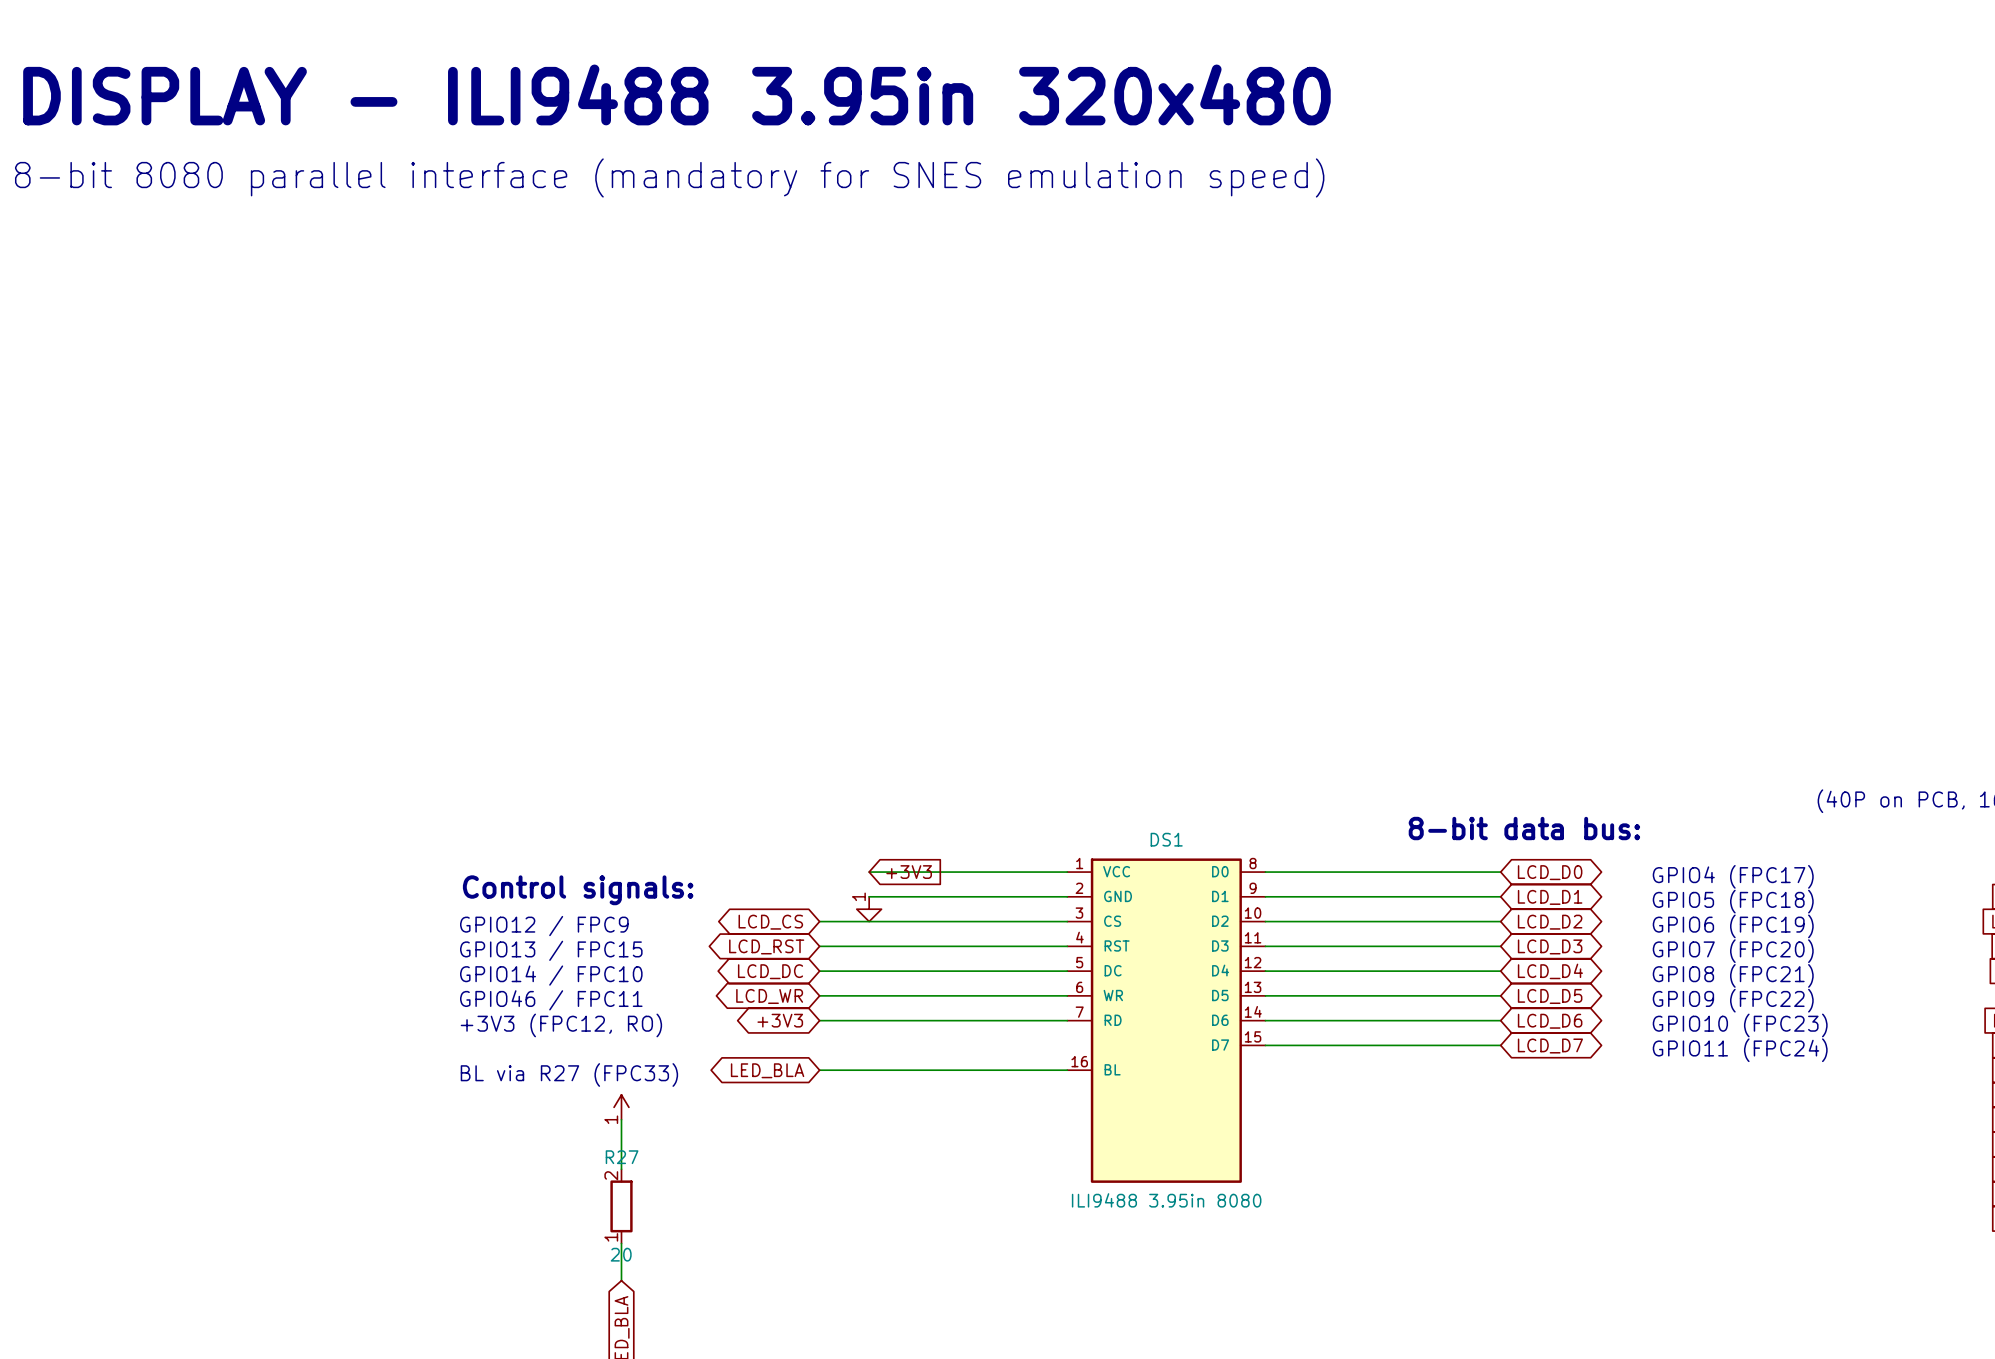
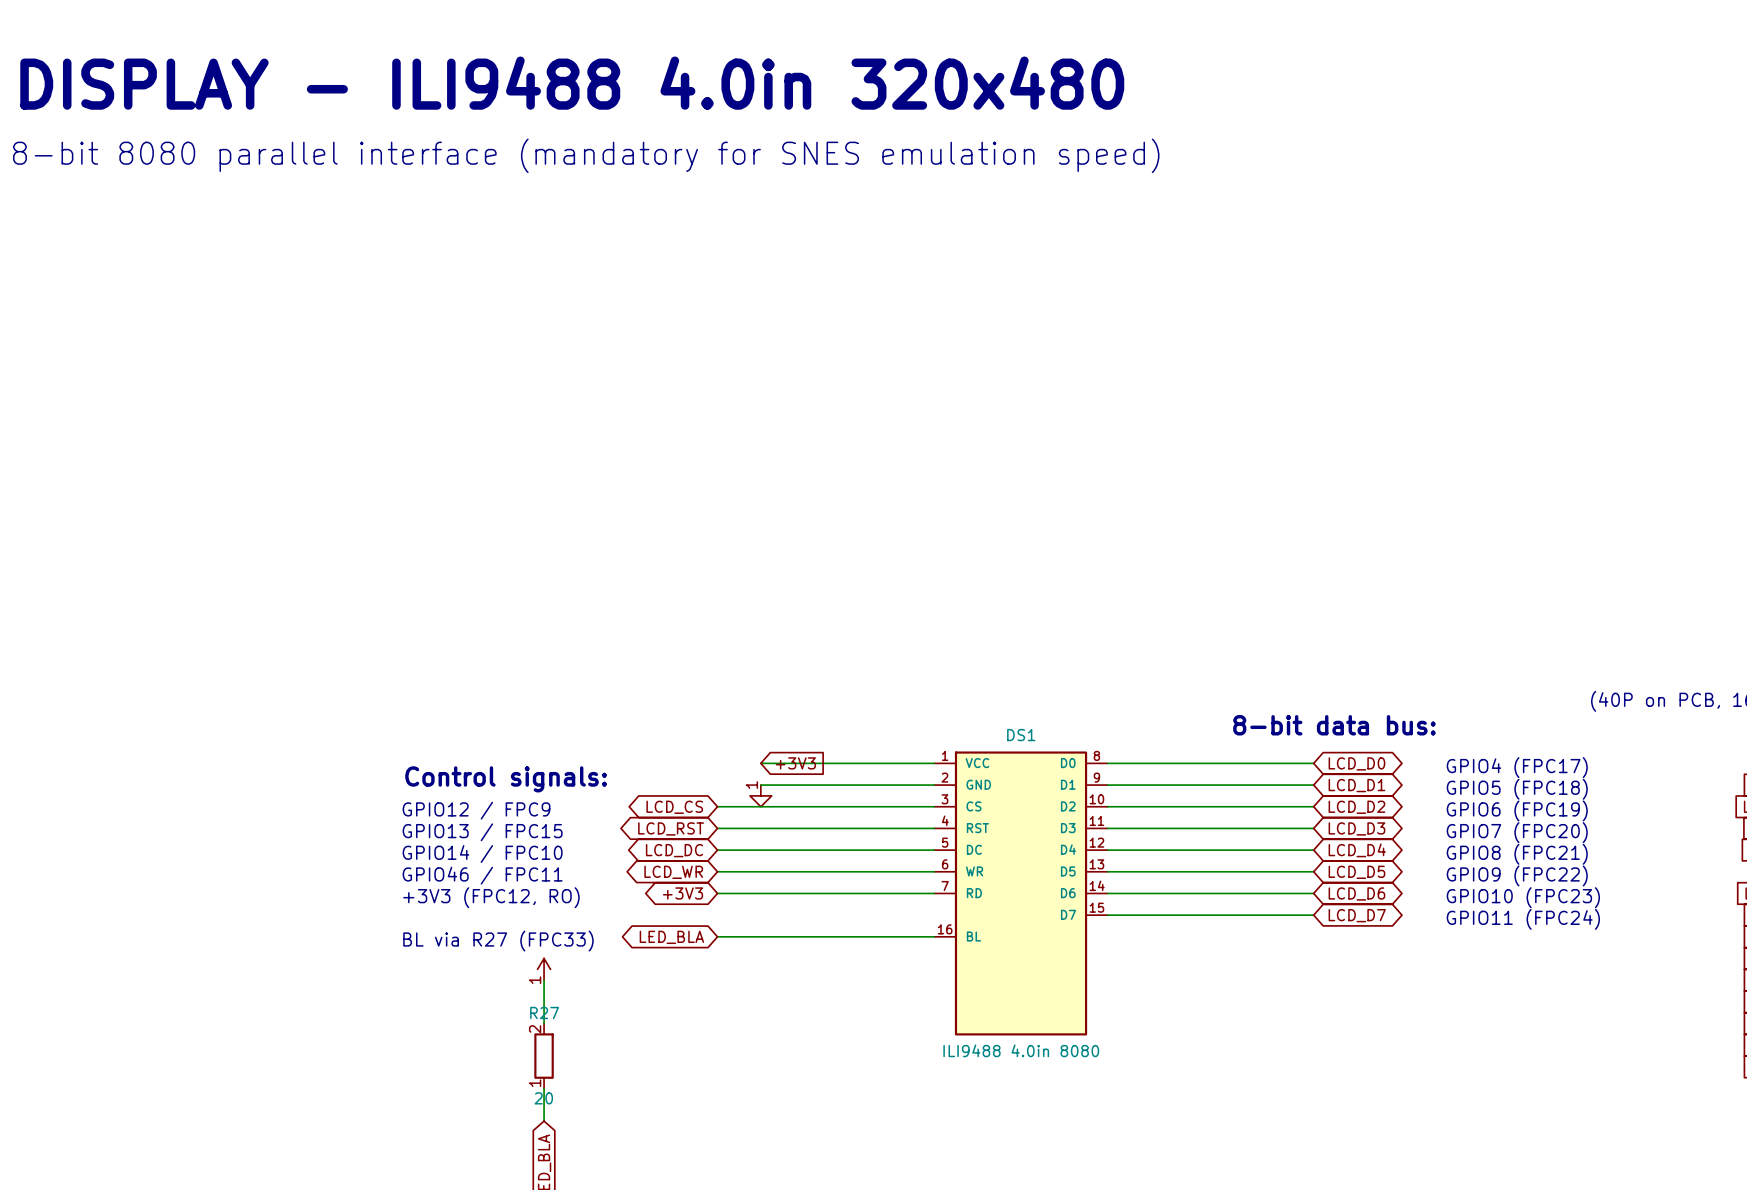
text: DISPLAY - ILI9488 3.95in 320x480 (676, 94) -> DISPLAY - ILI9488 4.0in 320x480 (572, 83)
DS1 value: ILI9488 3.95in 8080 (1166, 1200) -> ILI9488 4.0in 8080 (1021, 1050)

